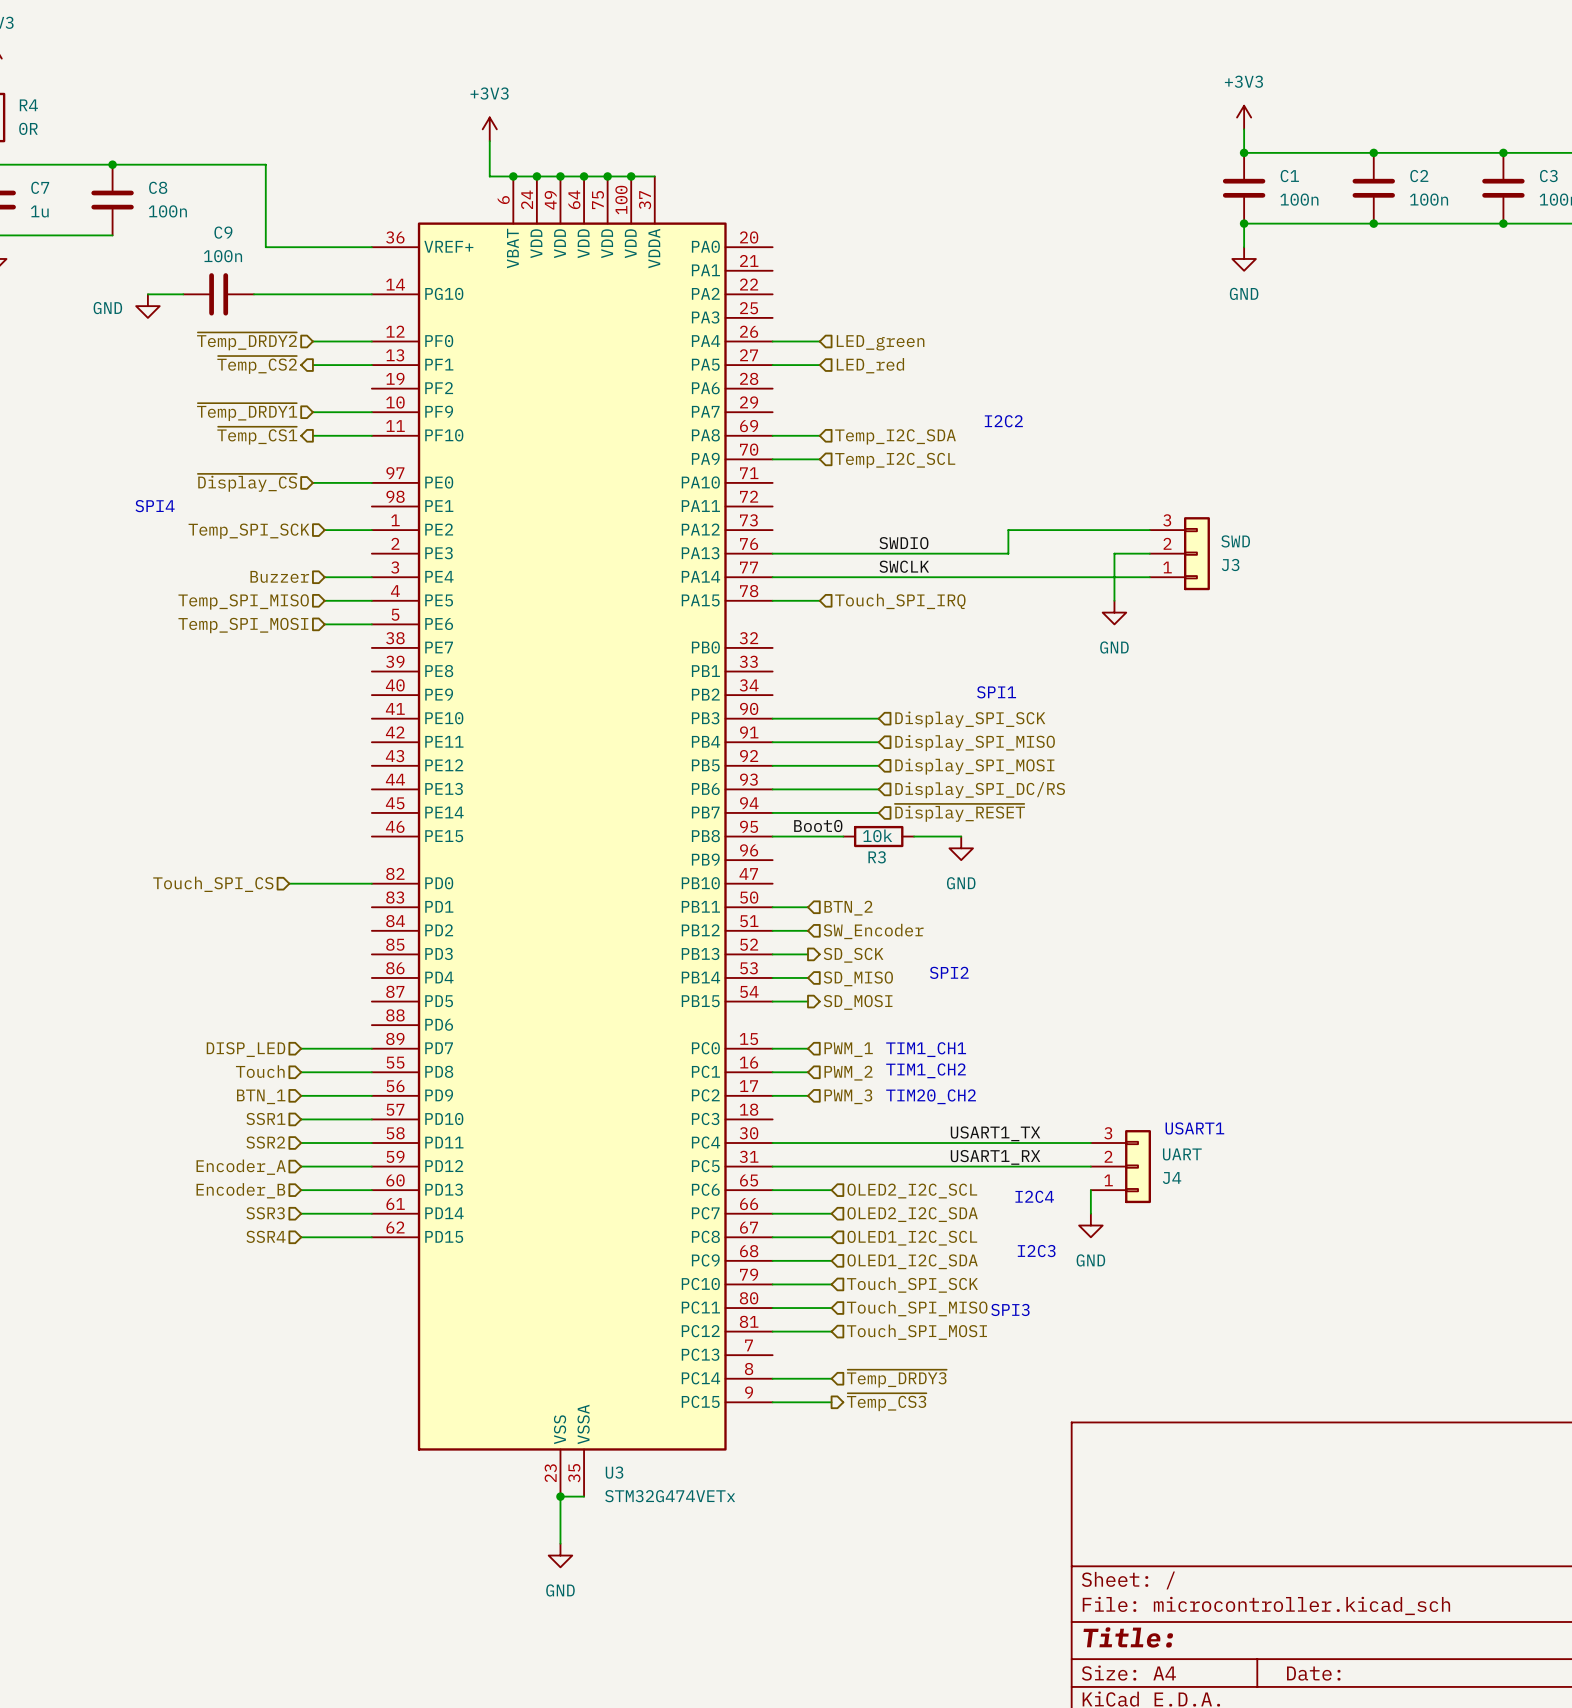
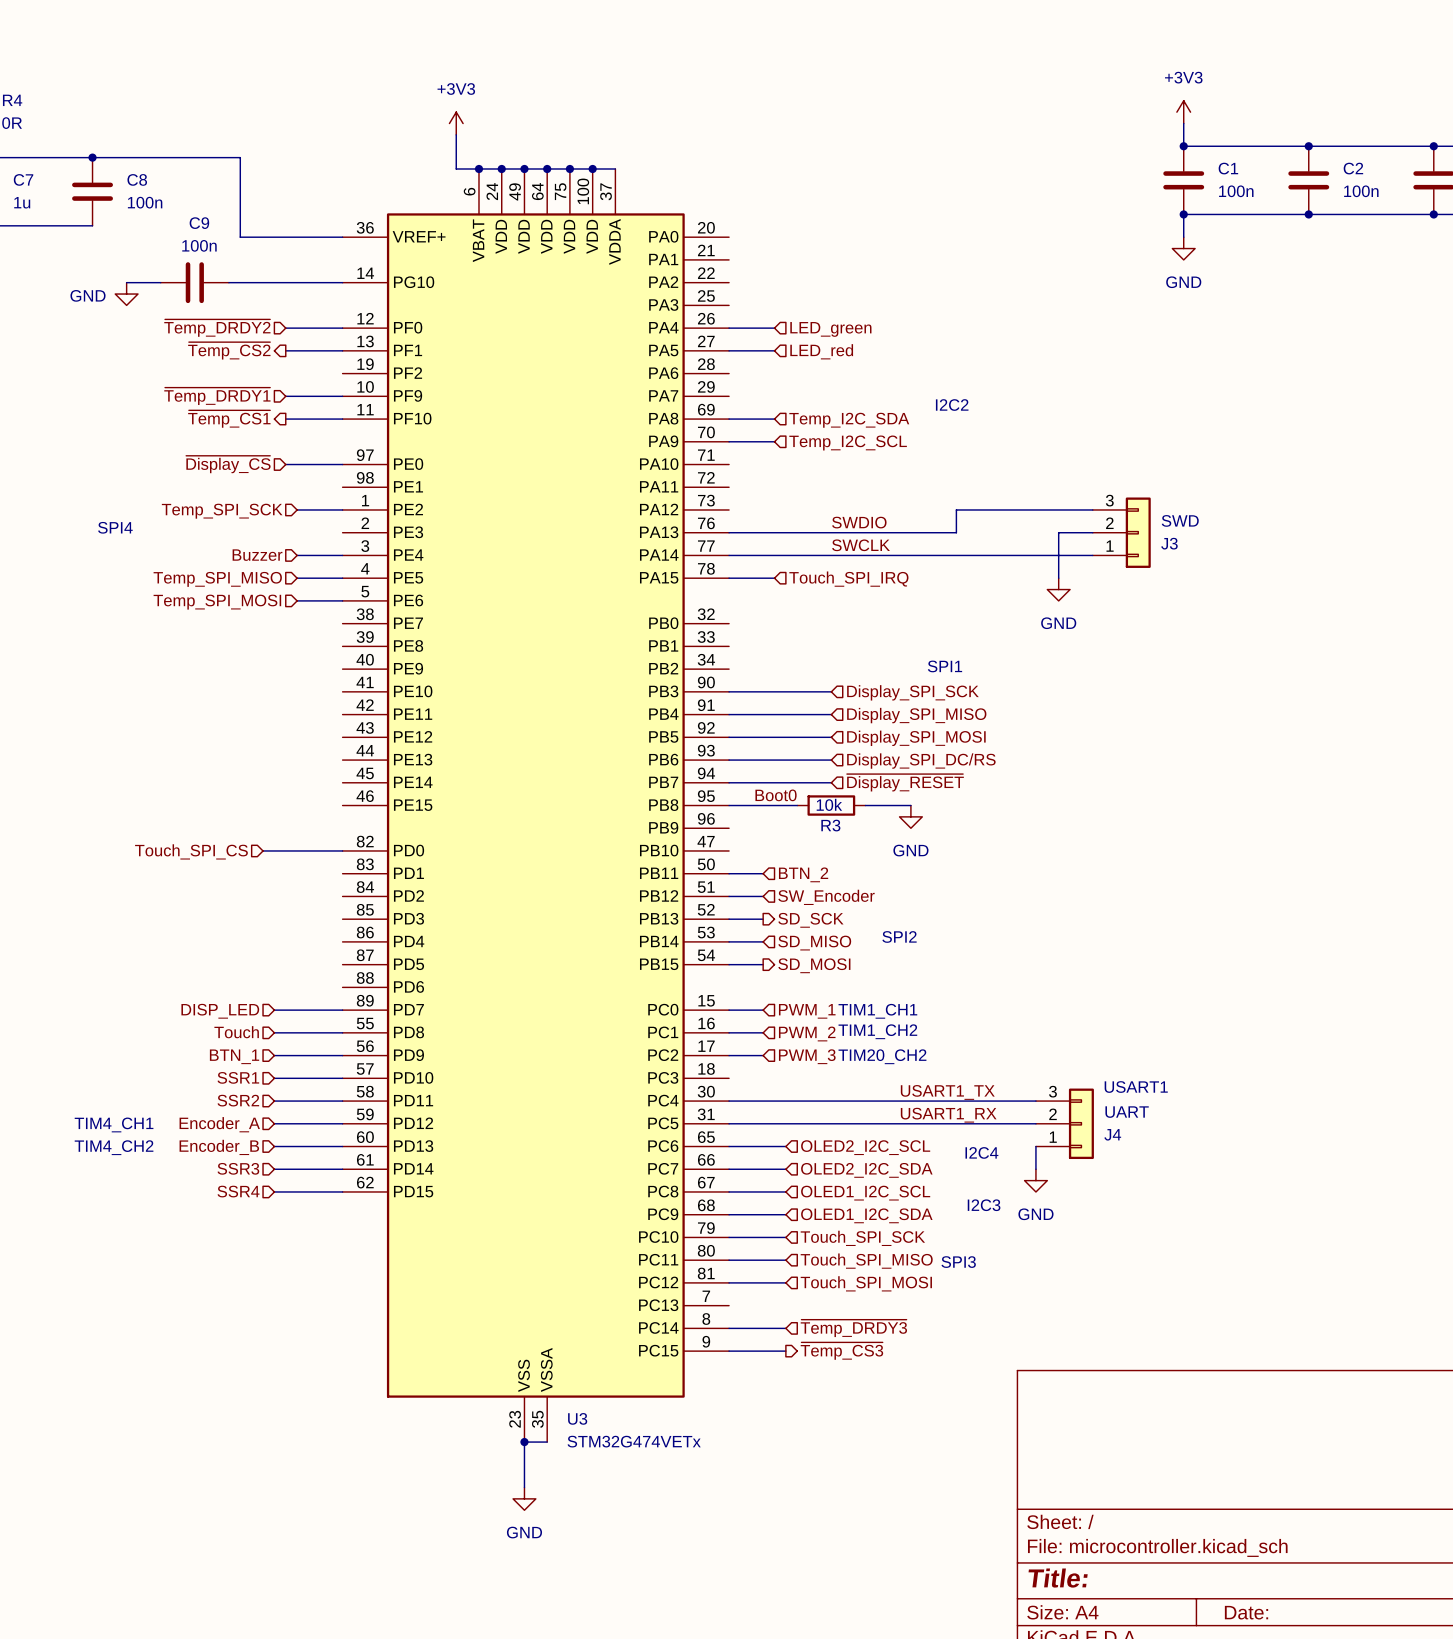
text position: SPI4 (155, 506) -> SPI4 (115, 527)
text: none -> TIM4_CH1 (114, 1124)
text: none -> TIM4_CH2 (114, 1147)

